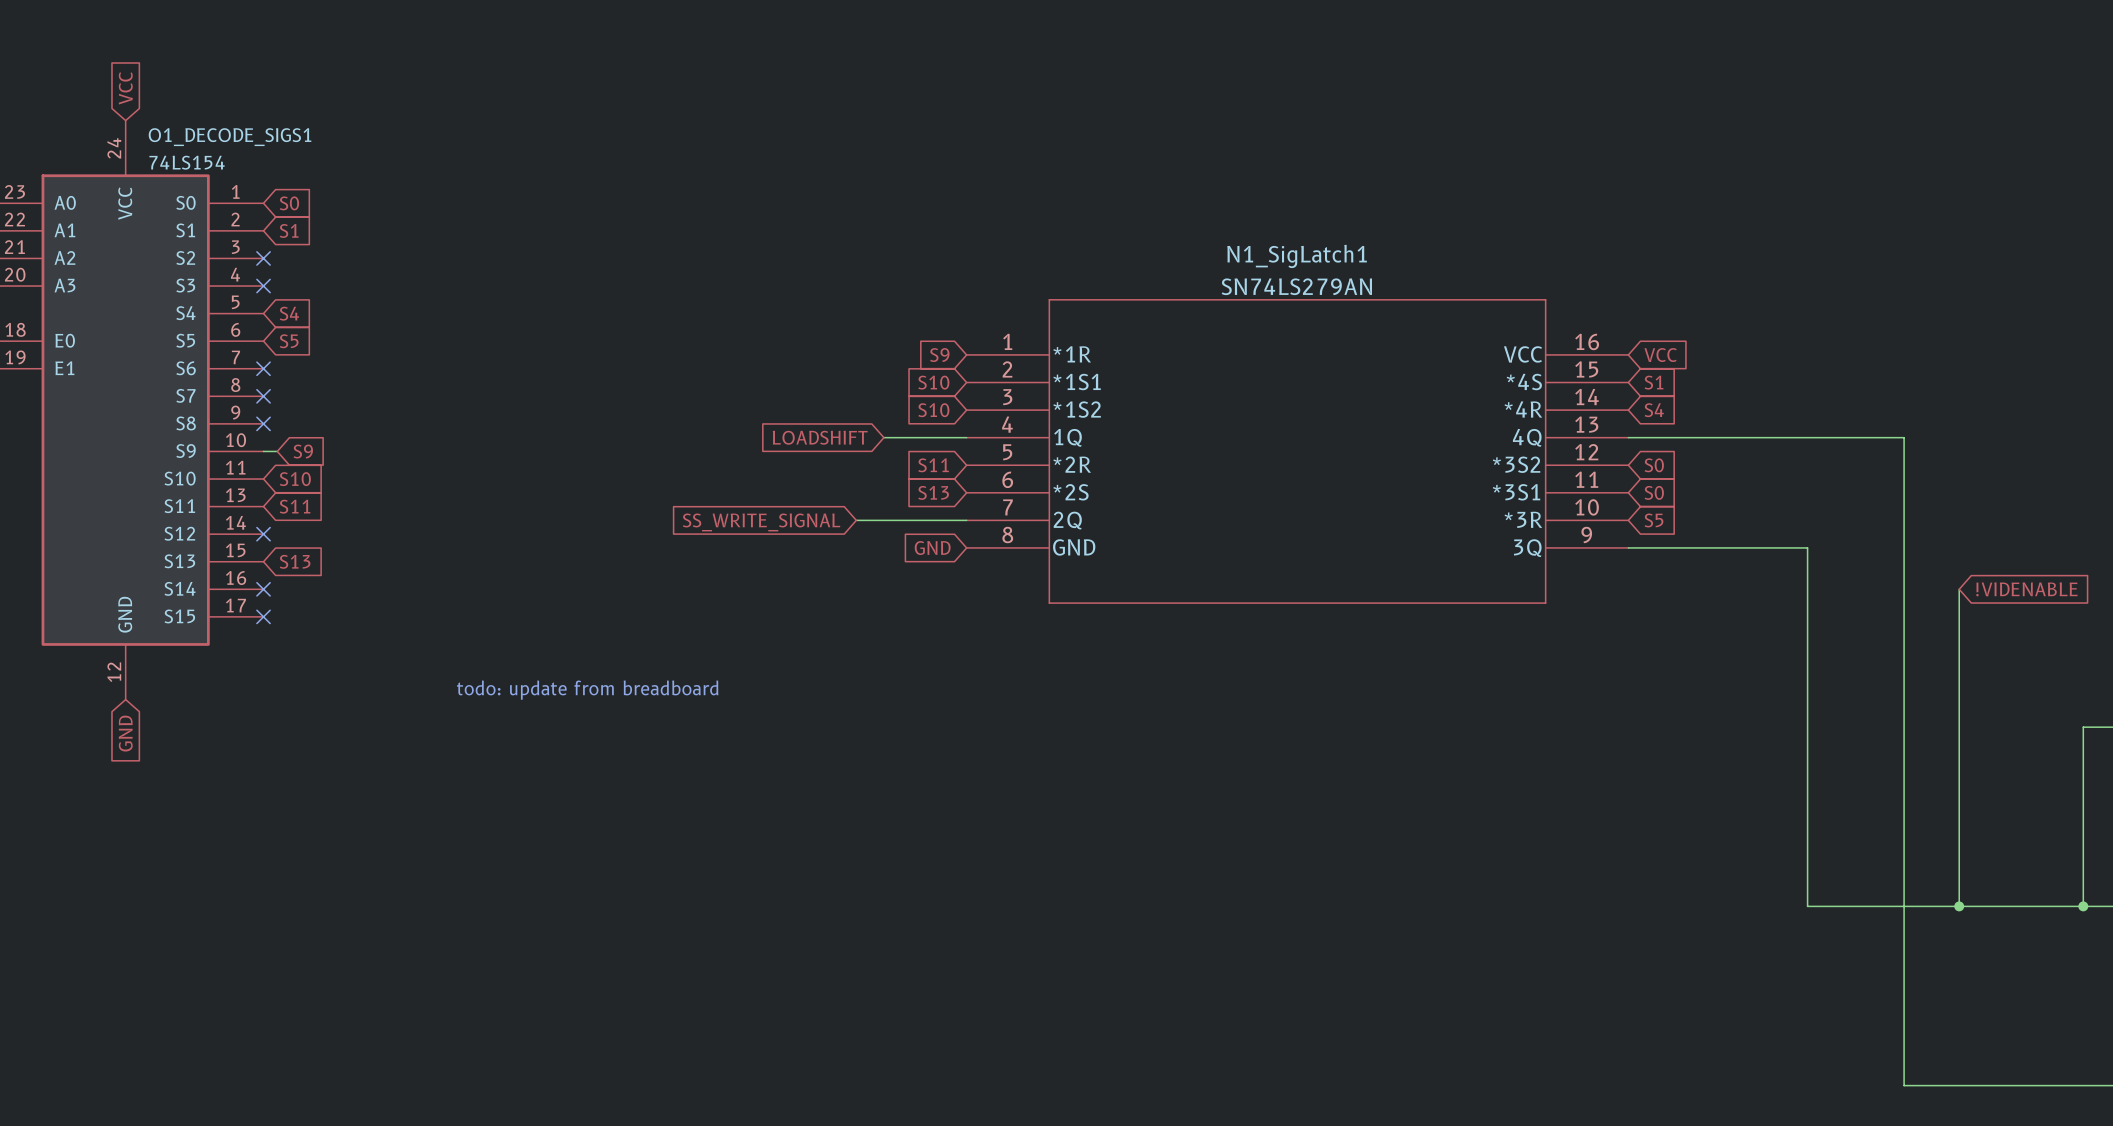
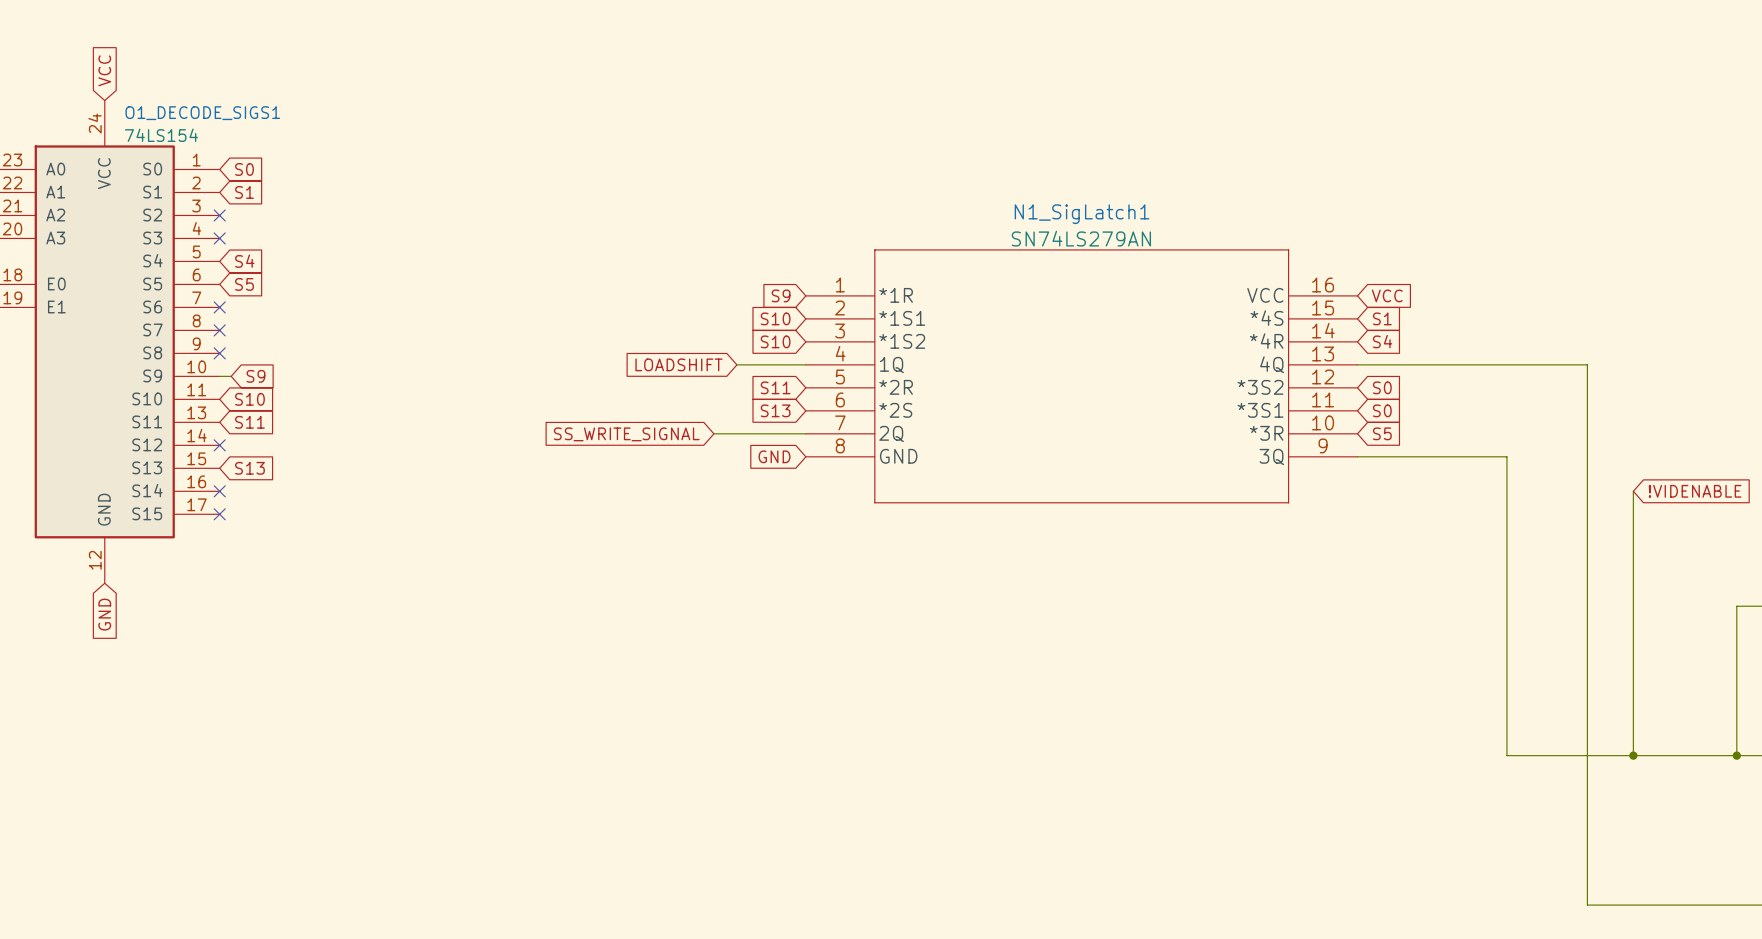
text: todo: update from breadboard (587, 690) -> none

